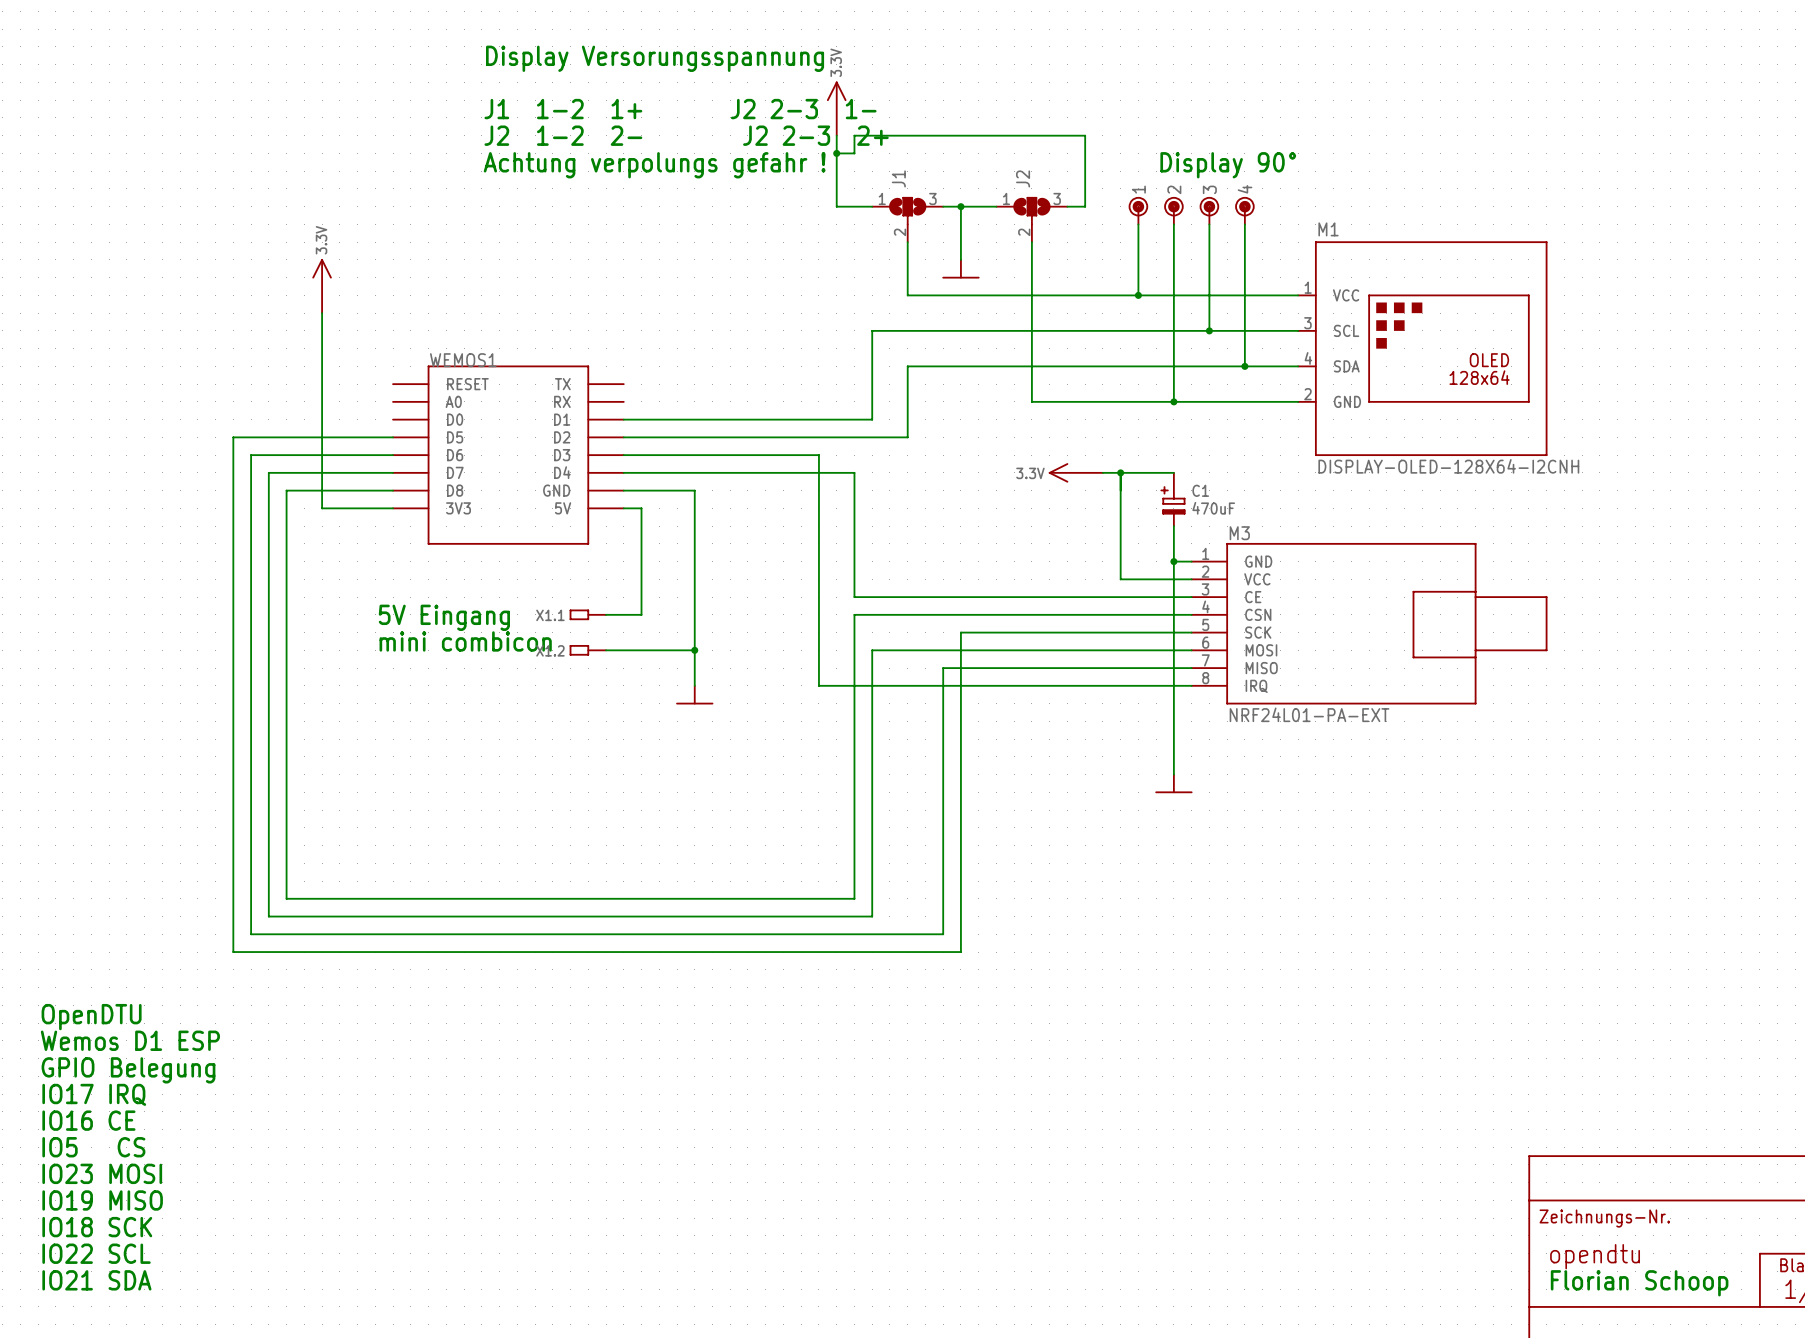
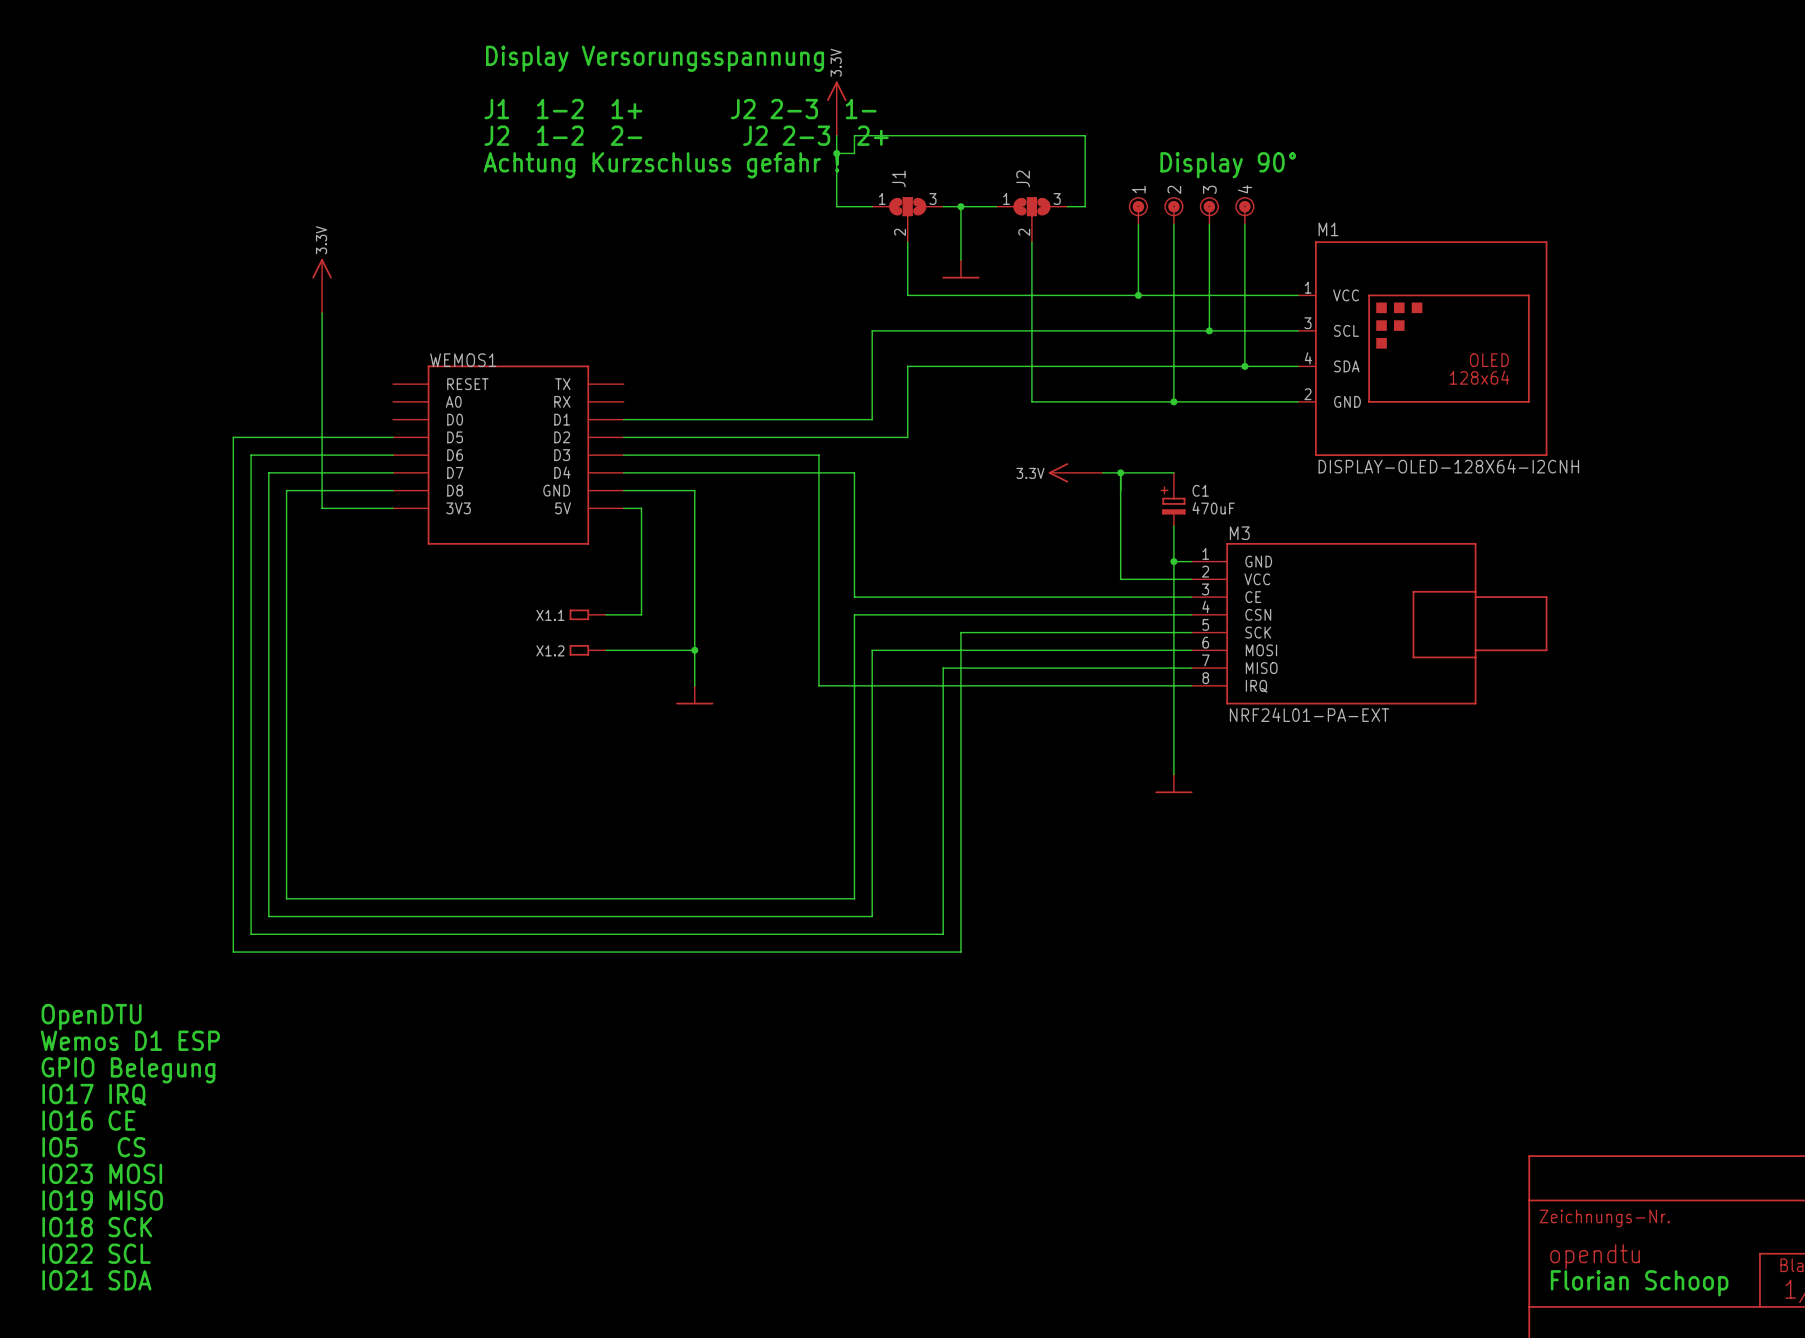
text: Achtung verpolungs gefahr ! (654, 165) -> Achtung Kurzschluss gefahr ! (661, 165)
text: 5V Eingang (444, 617) -> none
text: mini combicon (465, 641) -> none

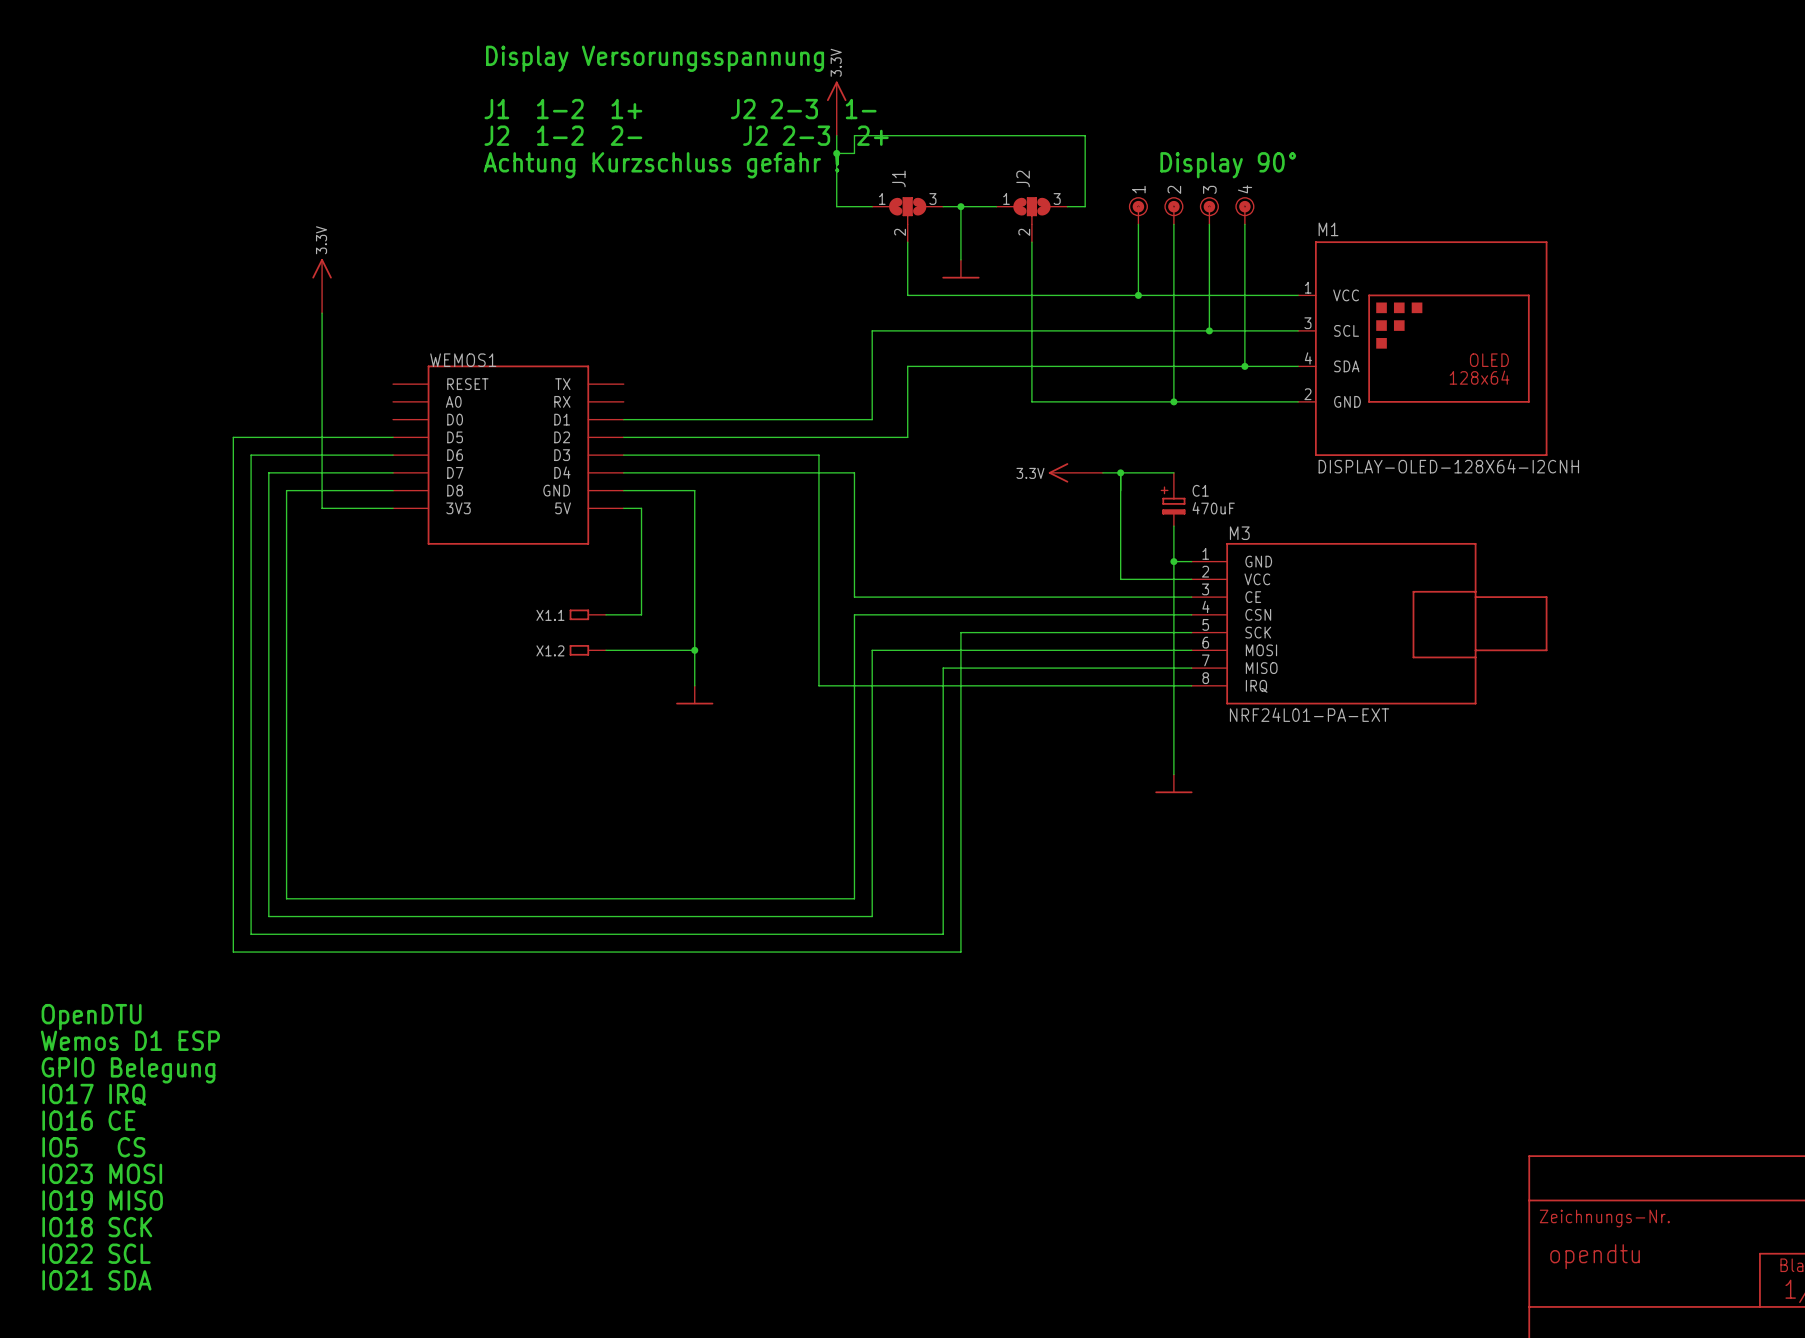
text: Florian Schoop (1639, 1283) -> none

